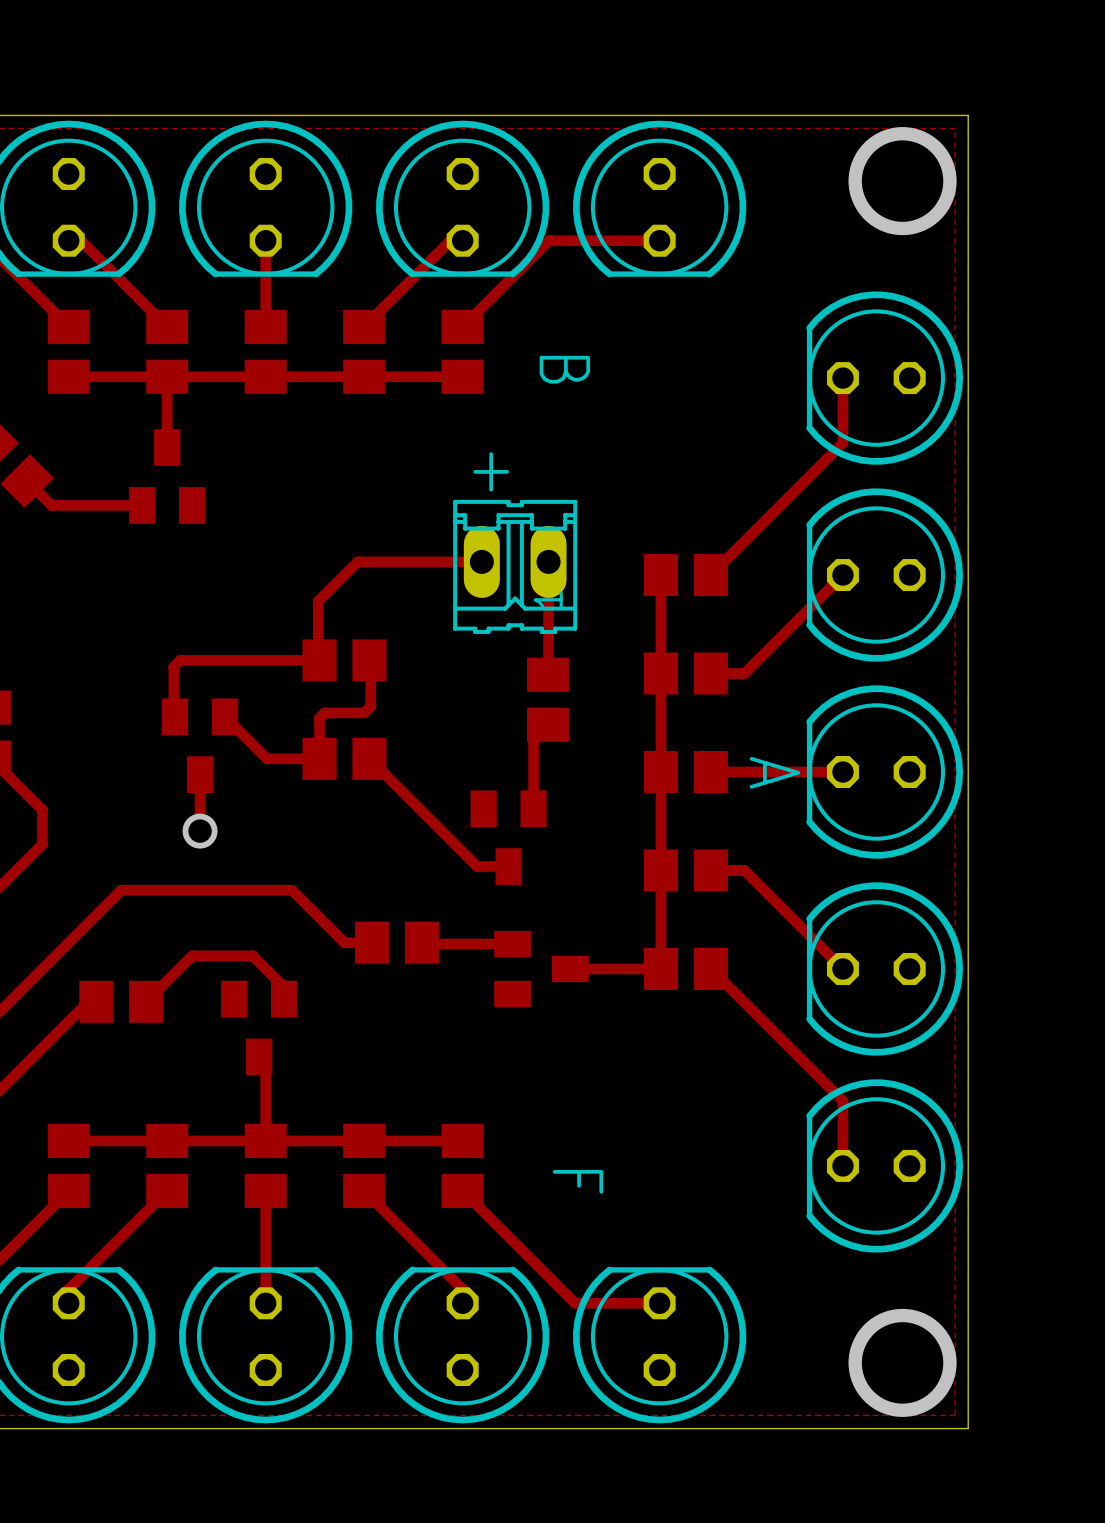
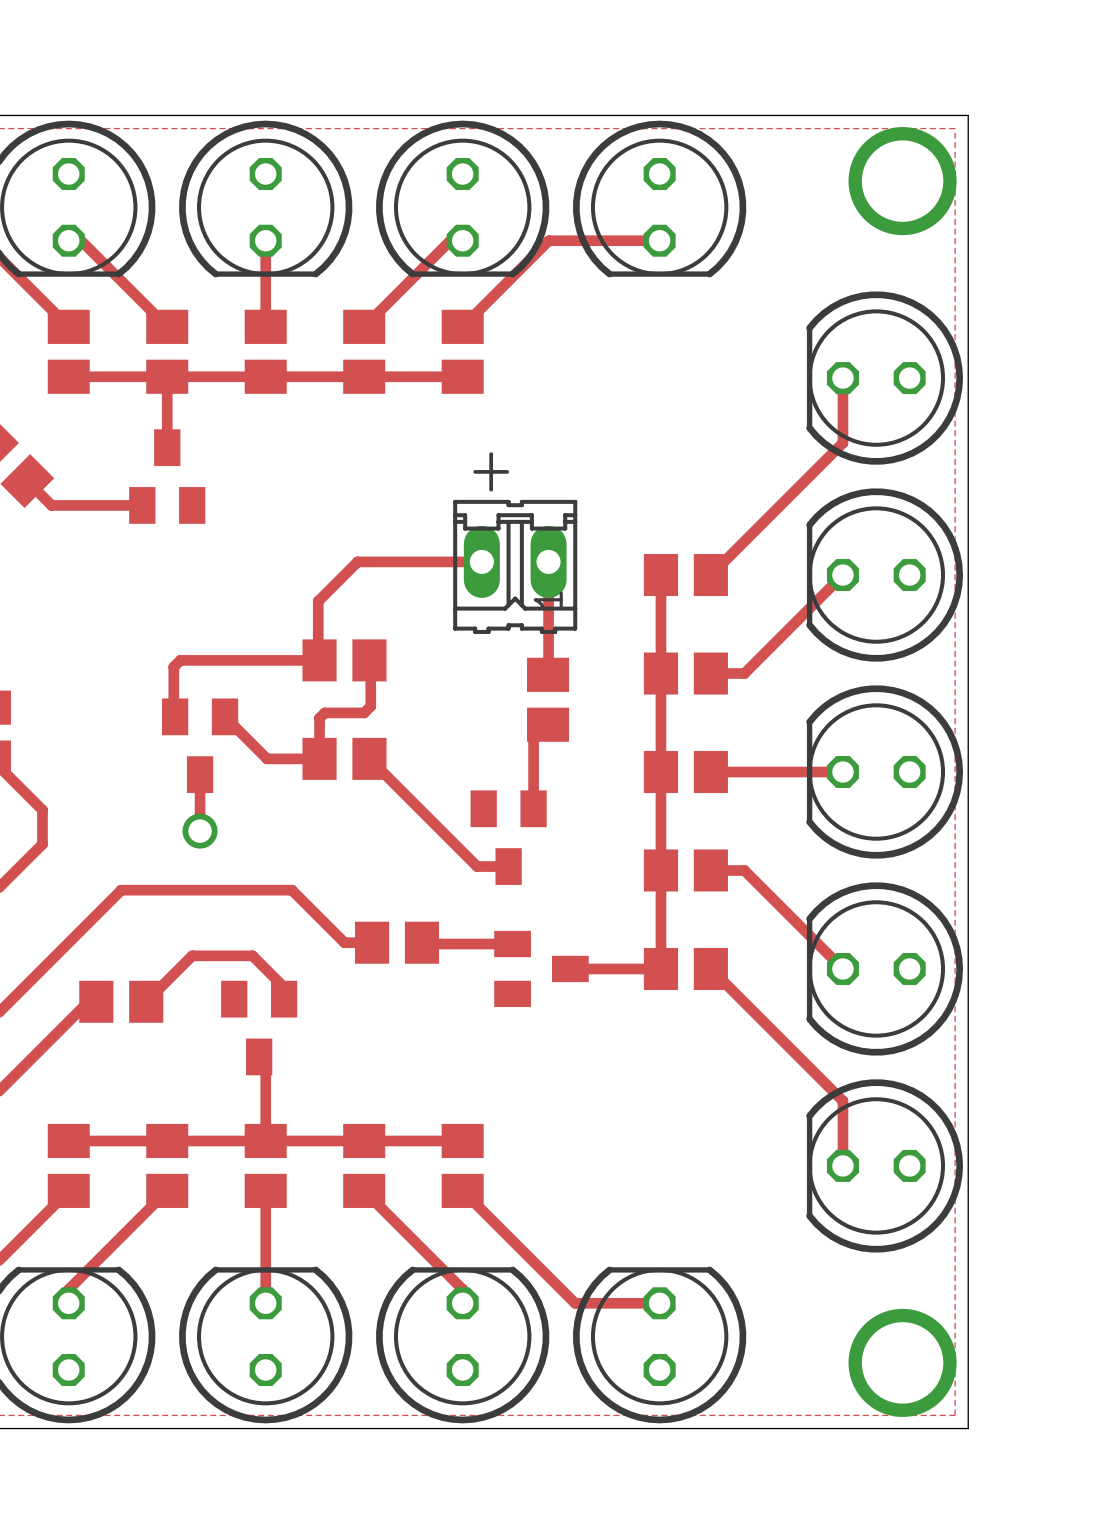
text: B (564, 369) -> none
text: A (774, 772) -> none
text: F (577, 1181) -> none

